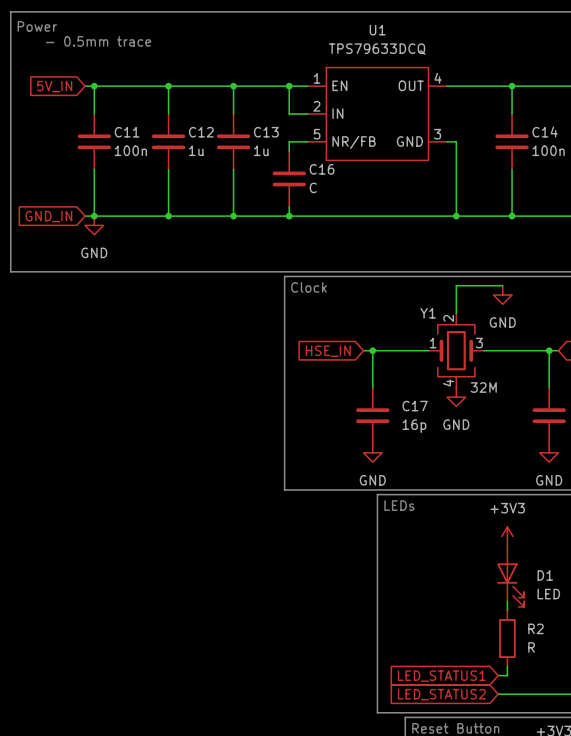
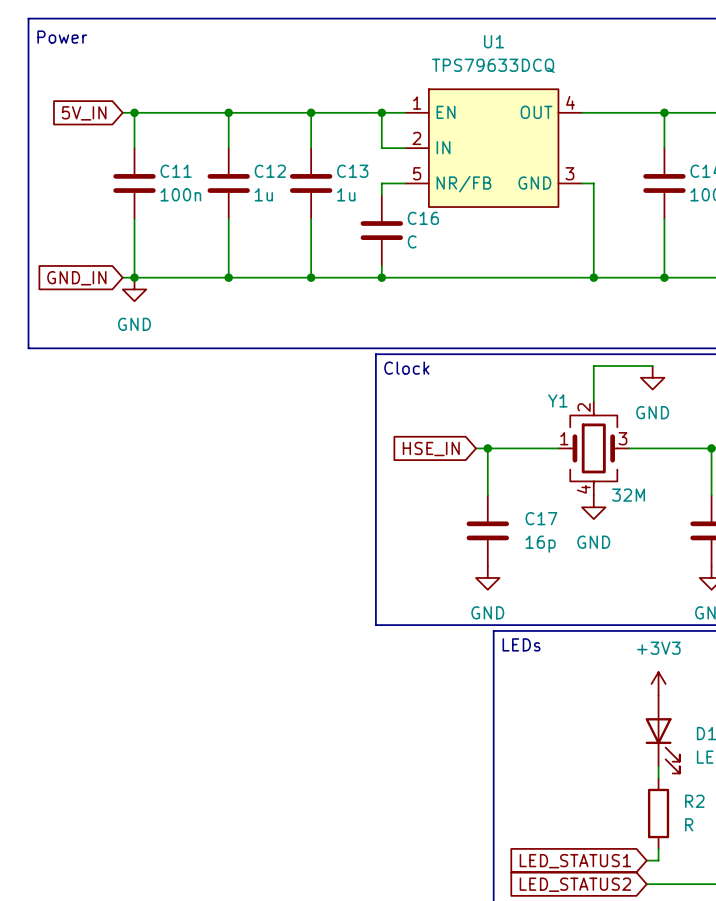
text: - 0.5mm trace (98, 41) -> none

